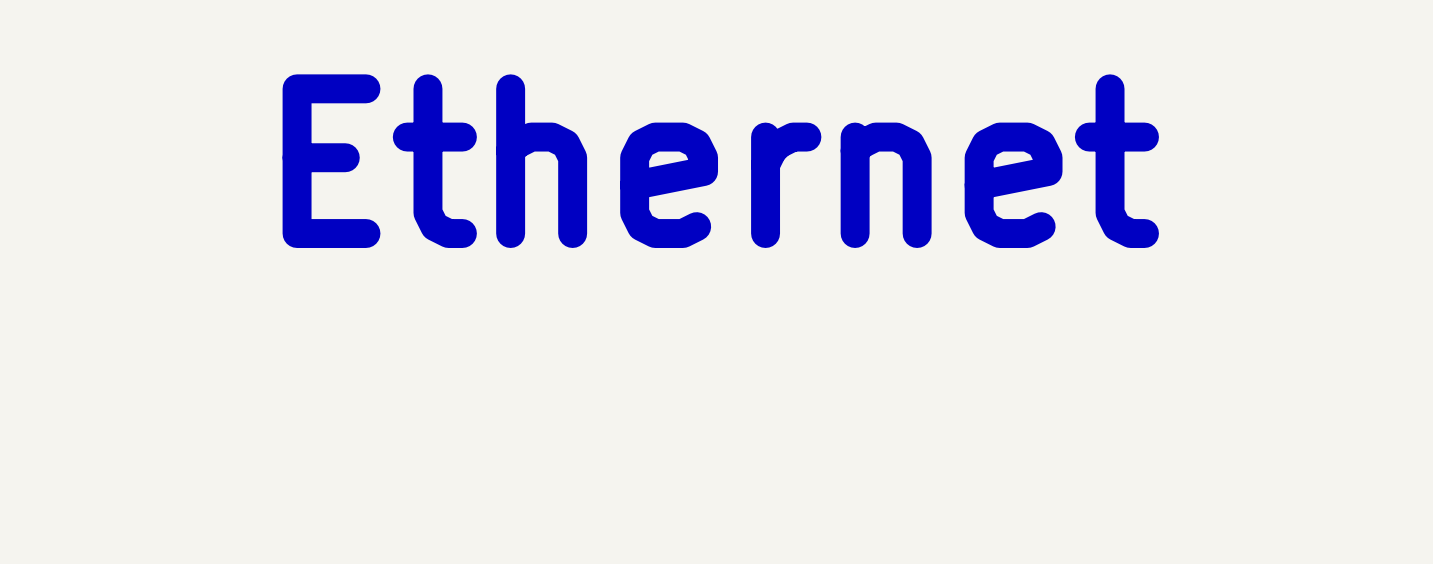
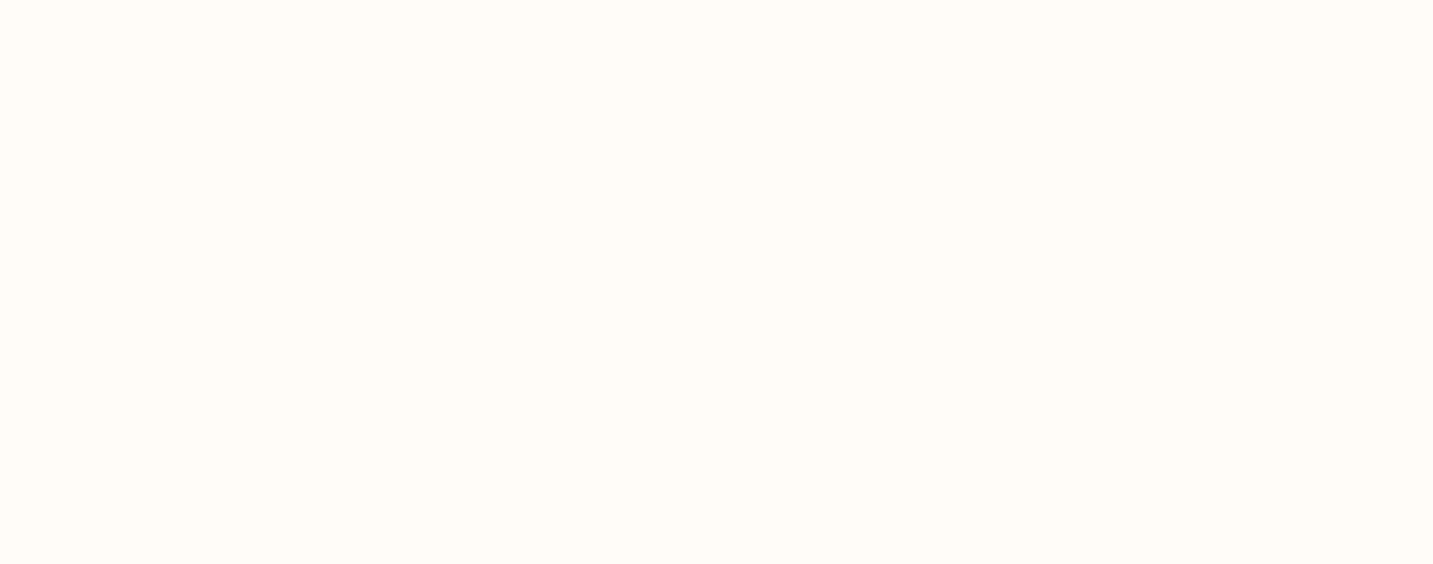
text: Ethernet (720, 161) -> none

